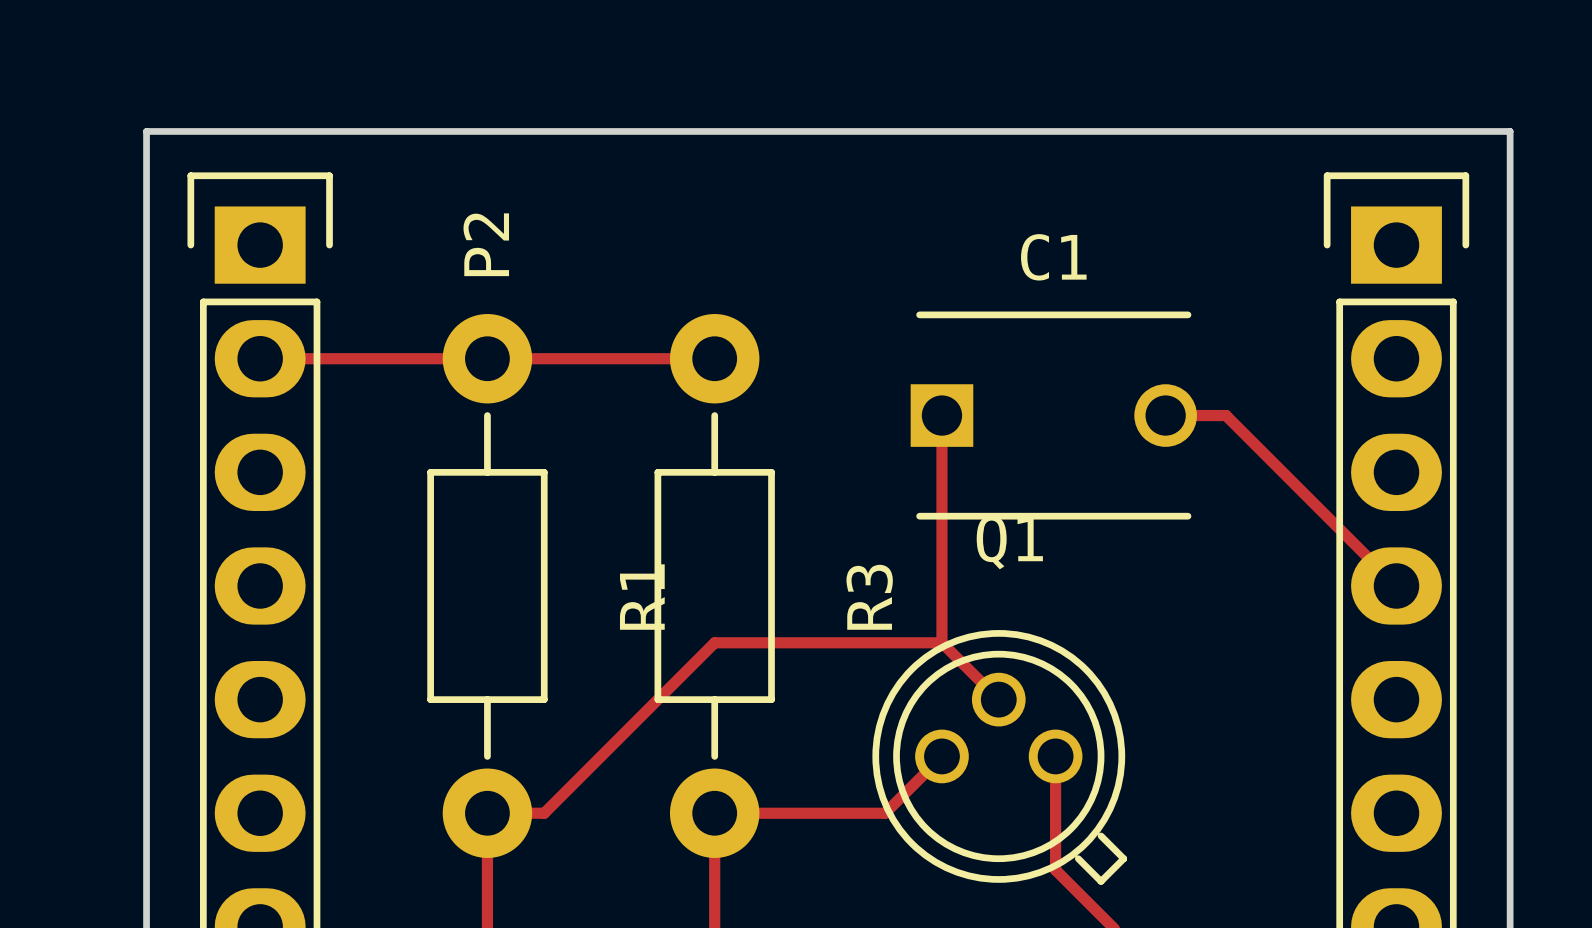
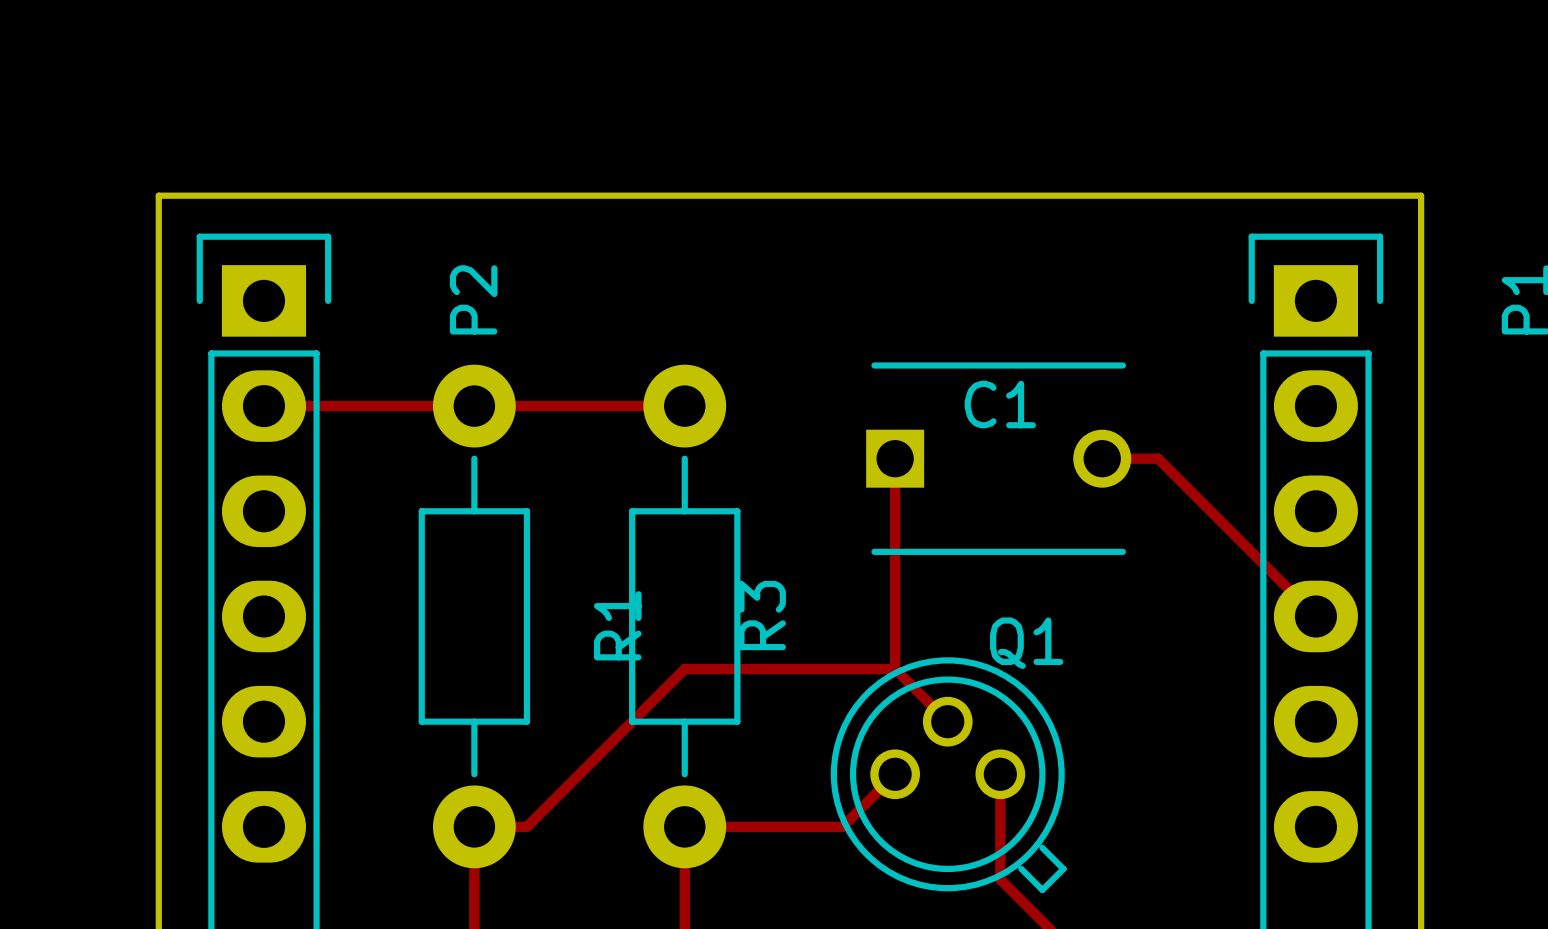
C1 name position: C1 (1053, 257) -> C1 (1000, 404)
Q1 name position: Q1 (1009, 542) -> Q1 (1026, 643)
R3 name position: R3 (869, 597) -> R3 (762, 615)

